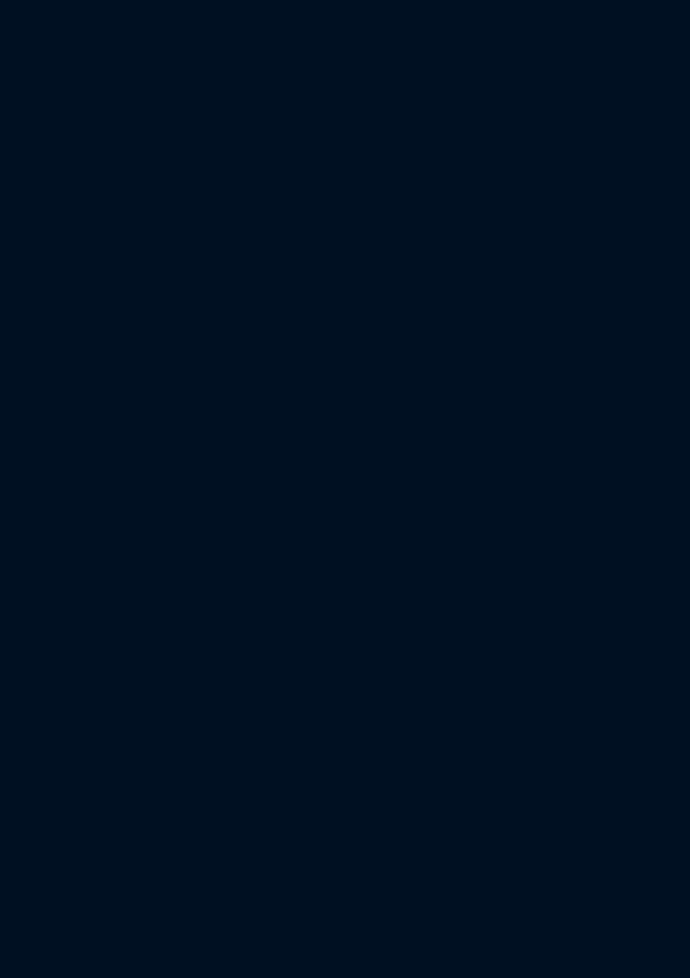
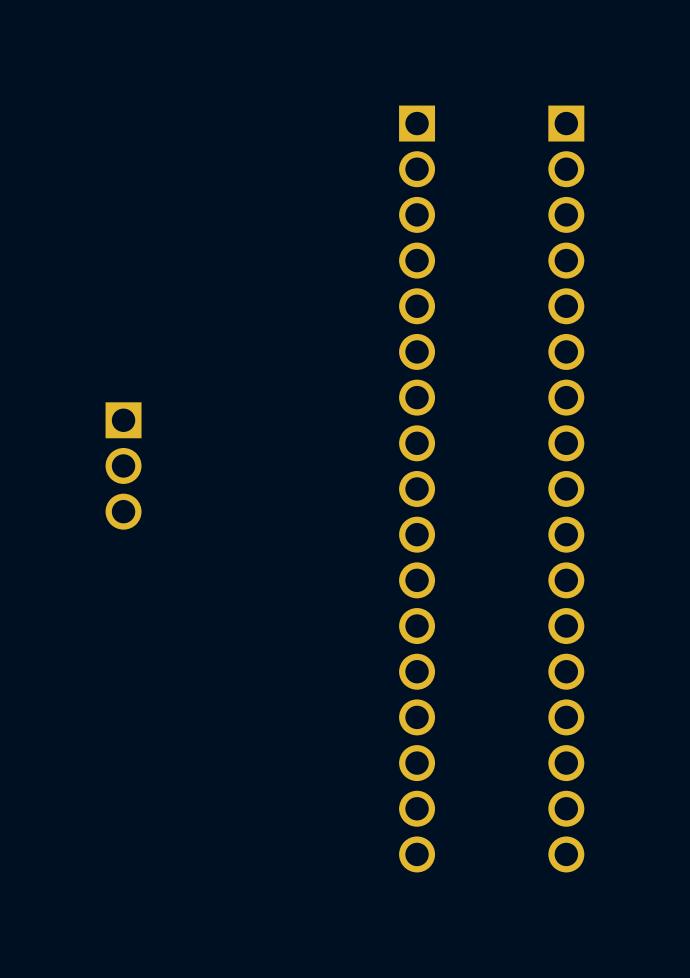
part: none -> (123, 465)
part: none -> (417, 488)
part: none -> (566, 488)

